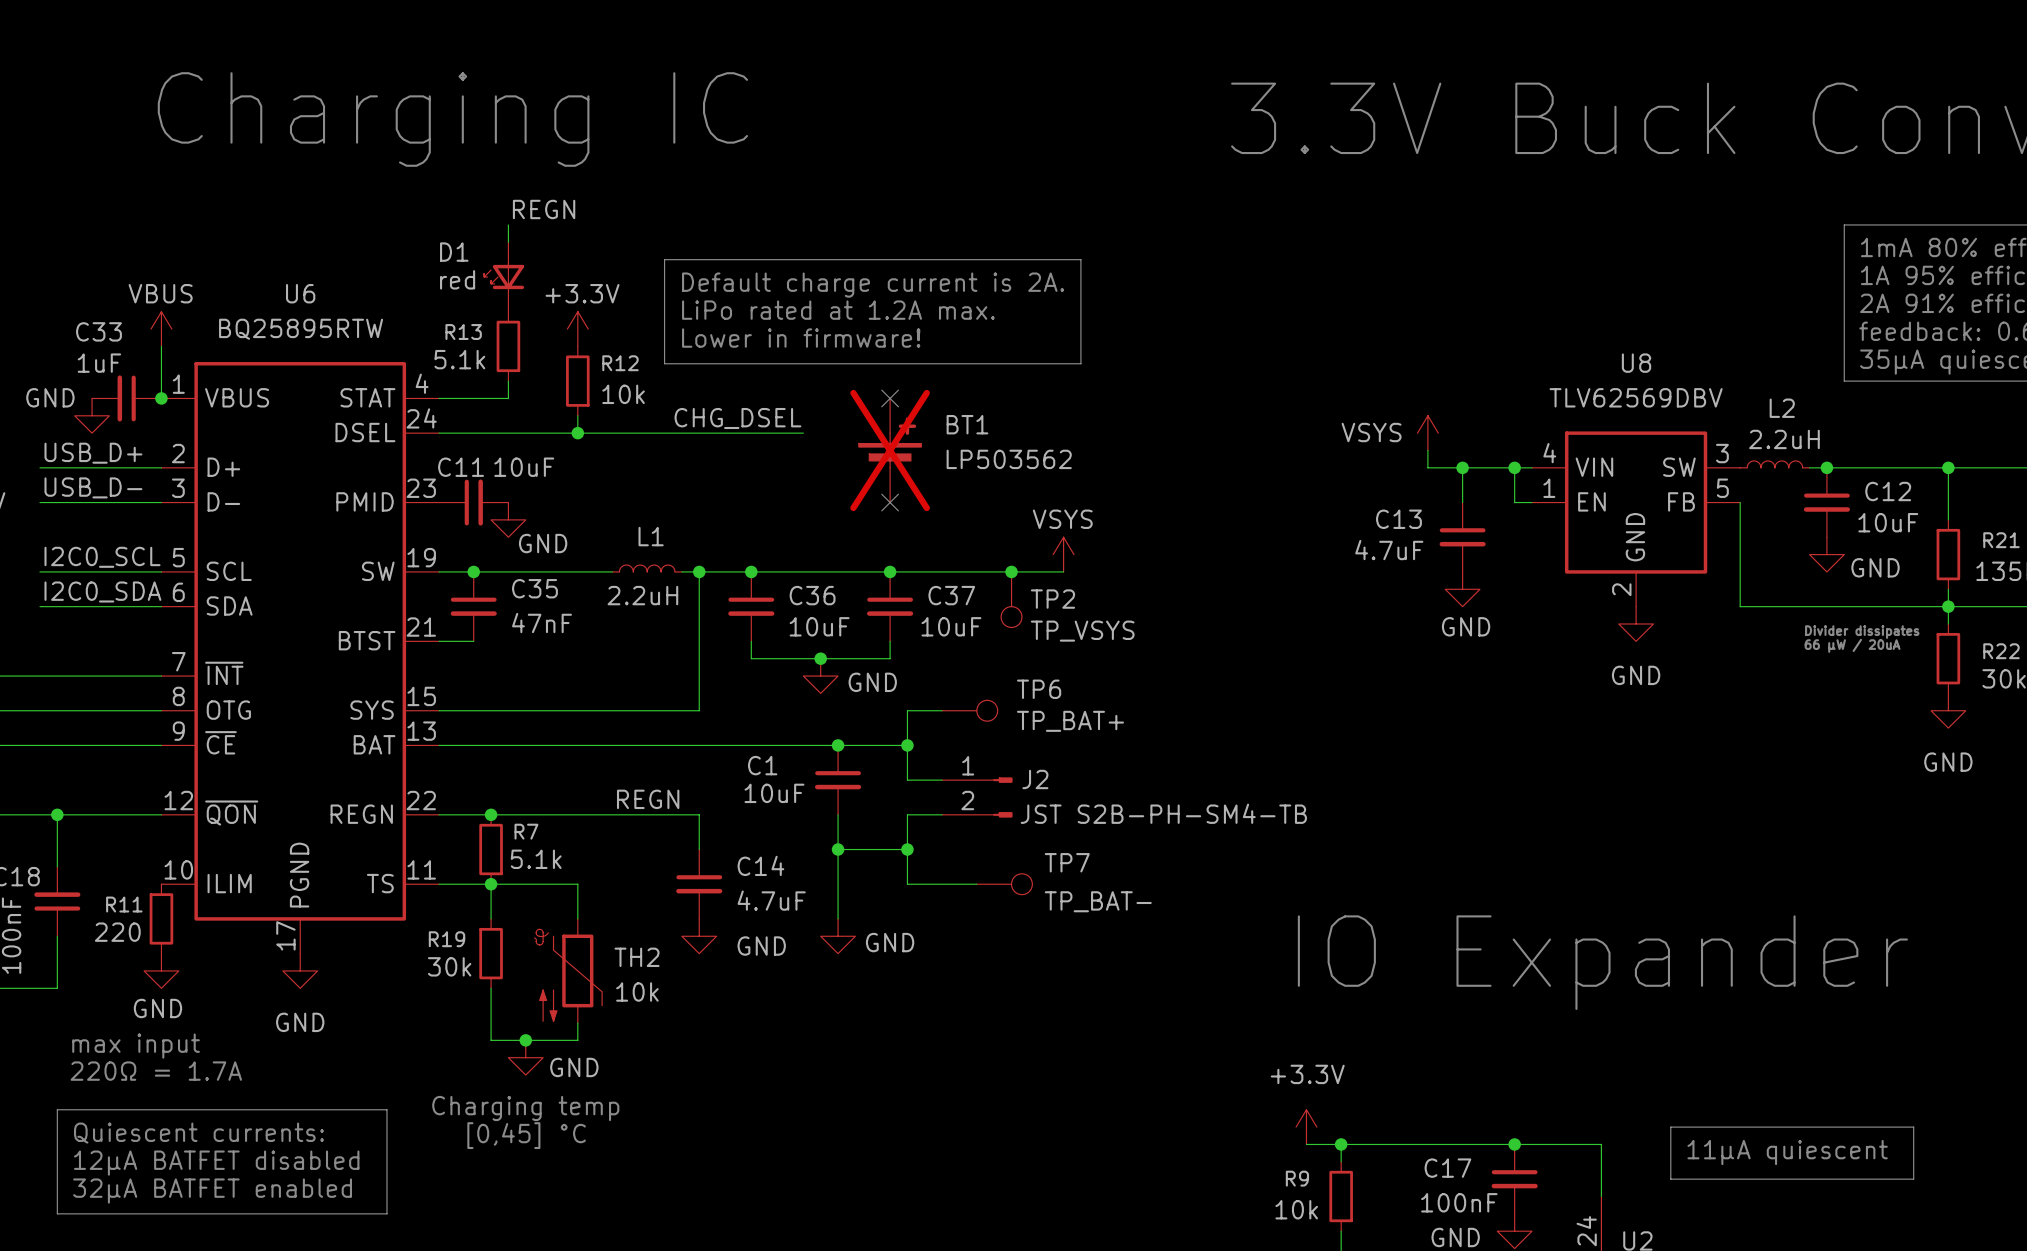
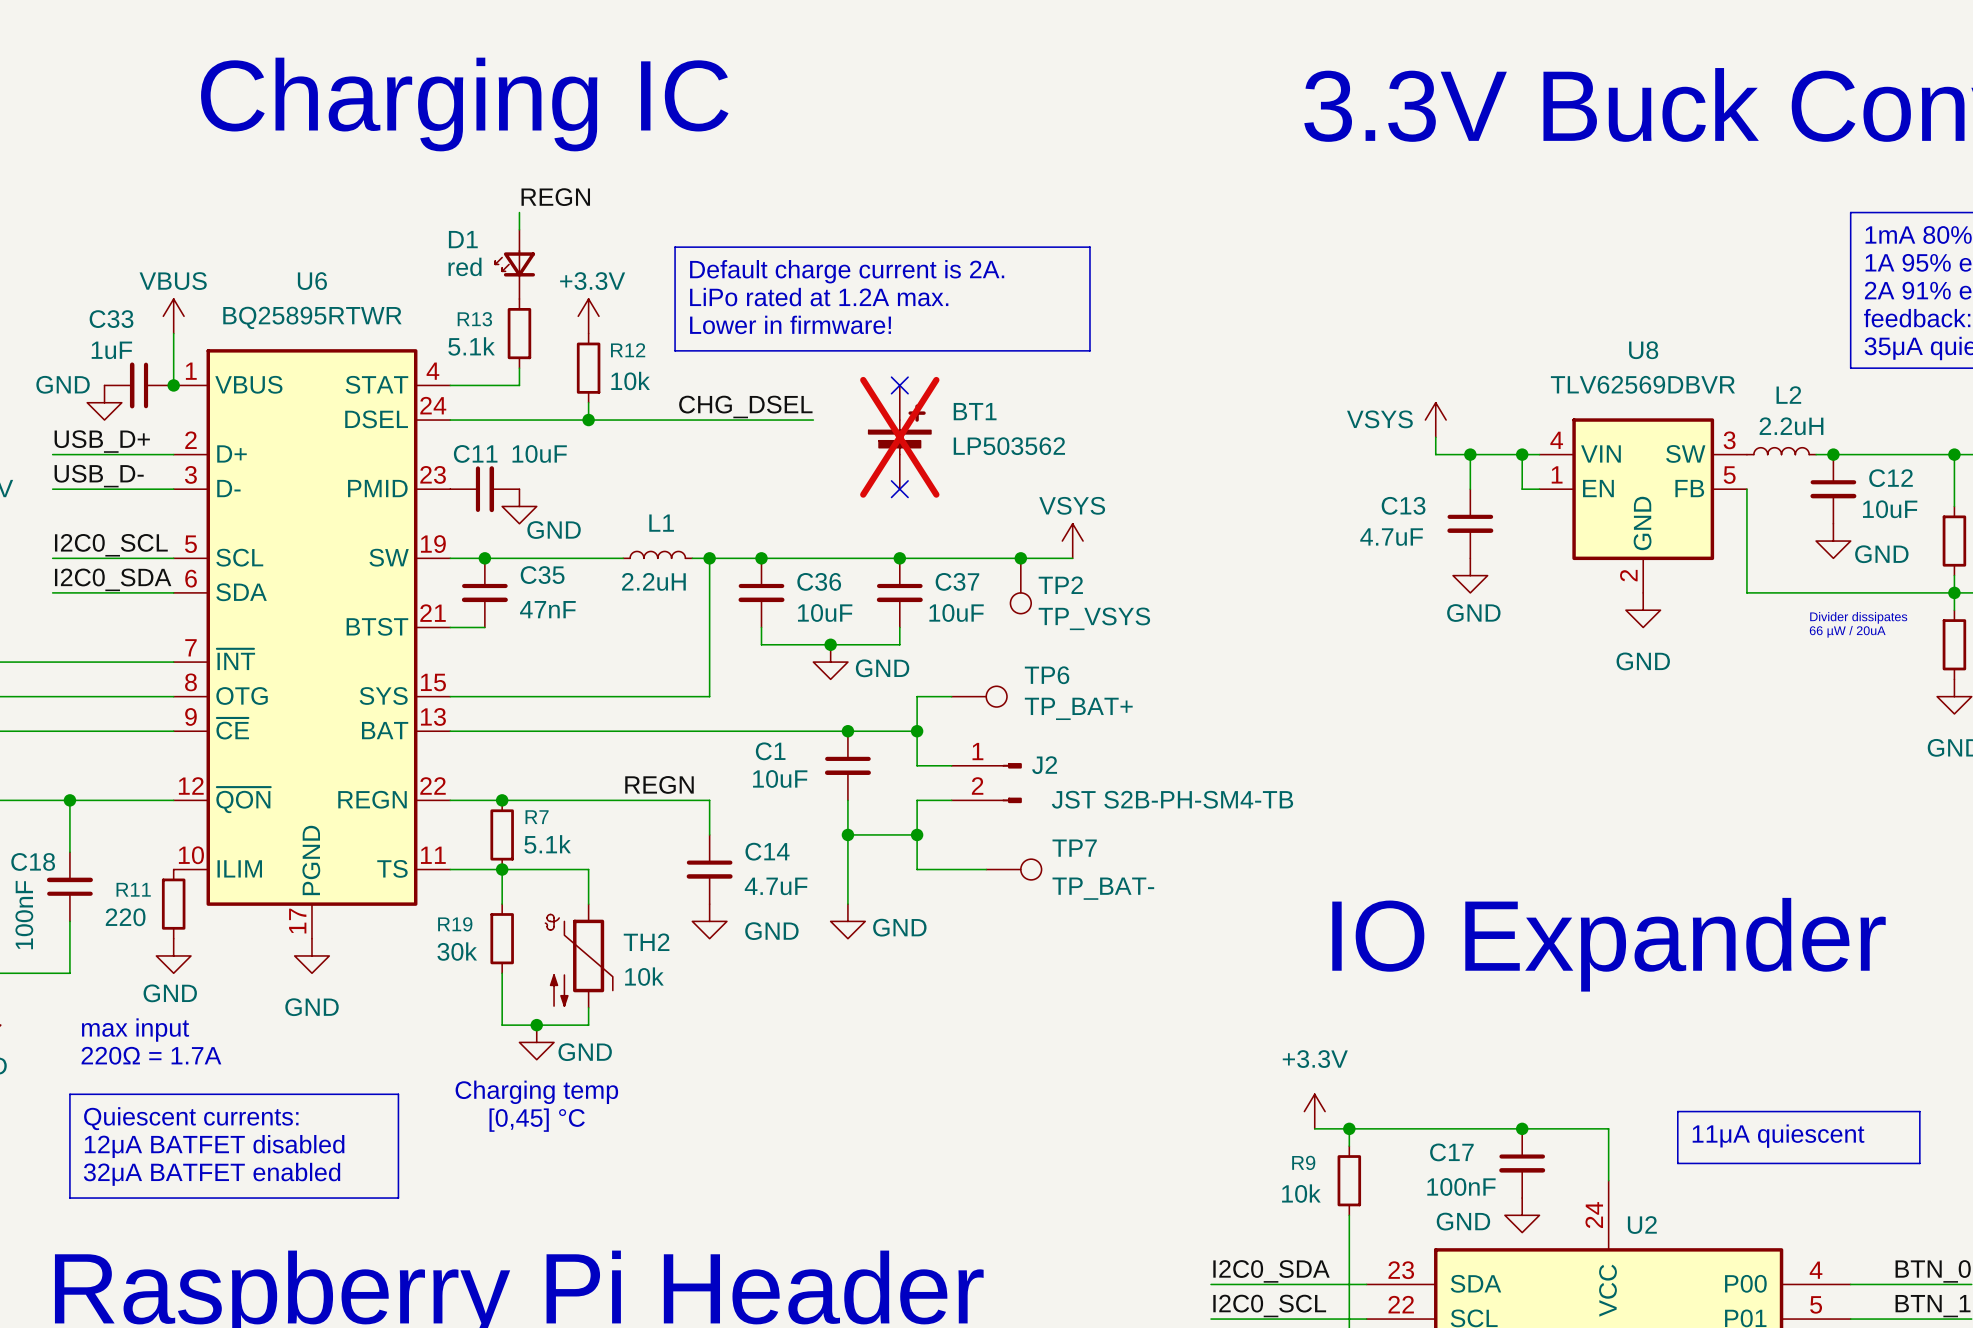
U6 value: BQ25895RTW (301, 329) -> BQ25895RTWR (312, 317)
U8 value: TLV62569DBV (1636, 397) -> TLV62569DBVR (1642, 384)

